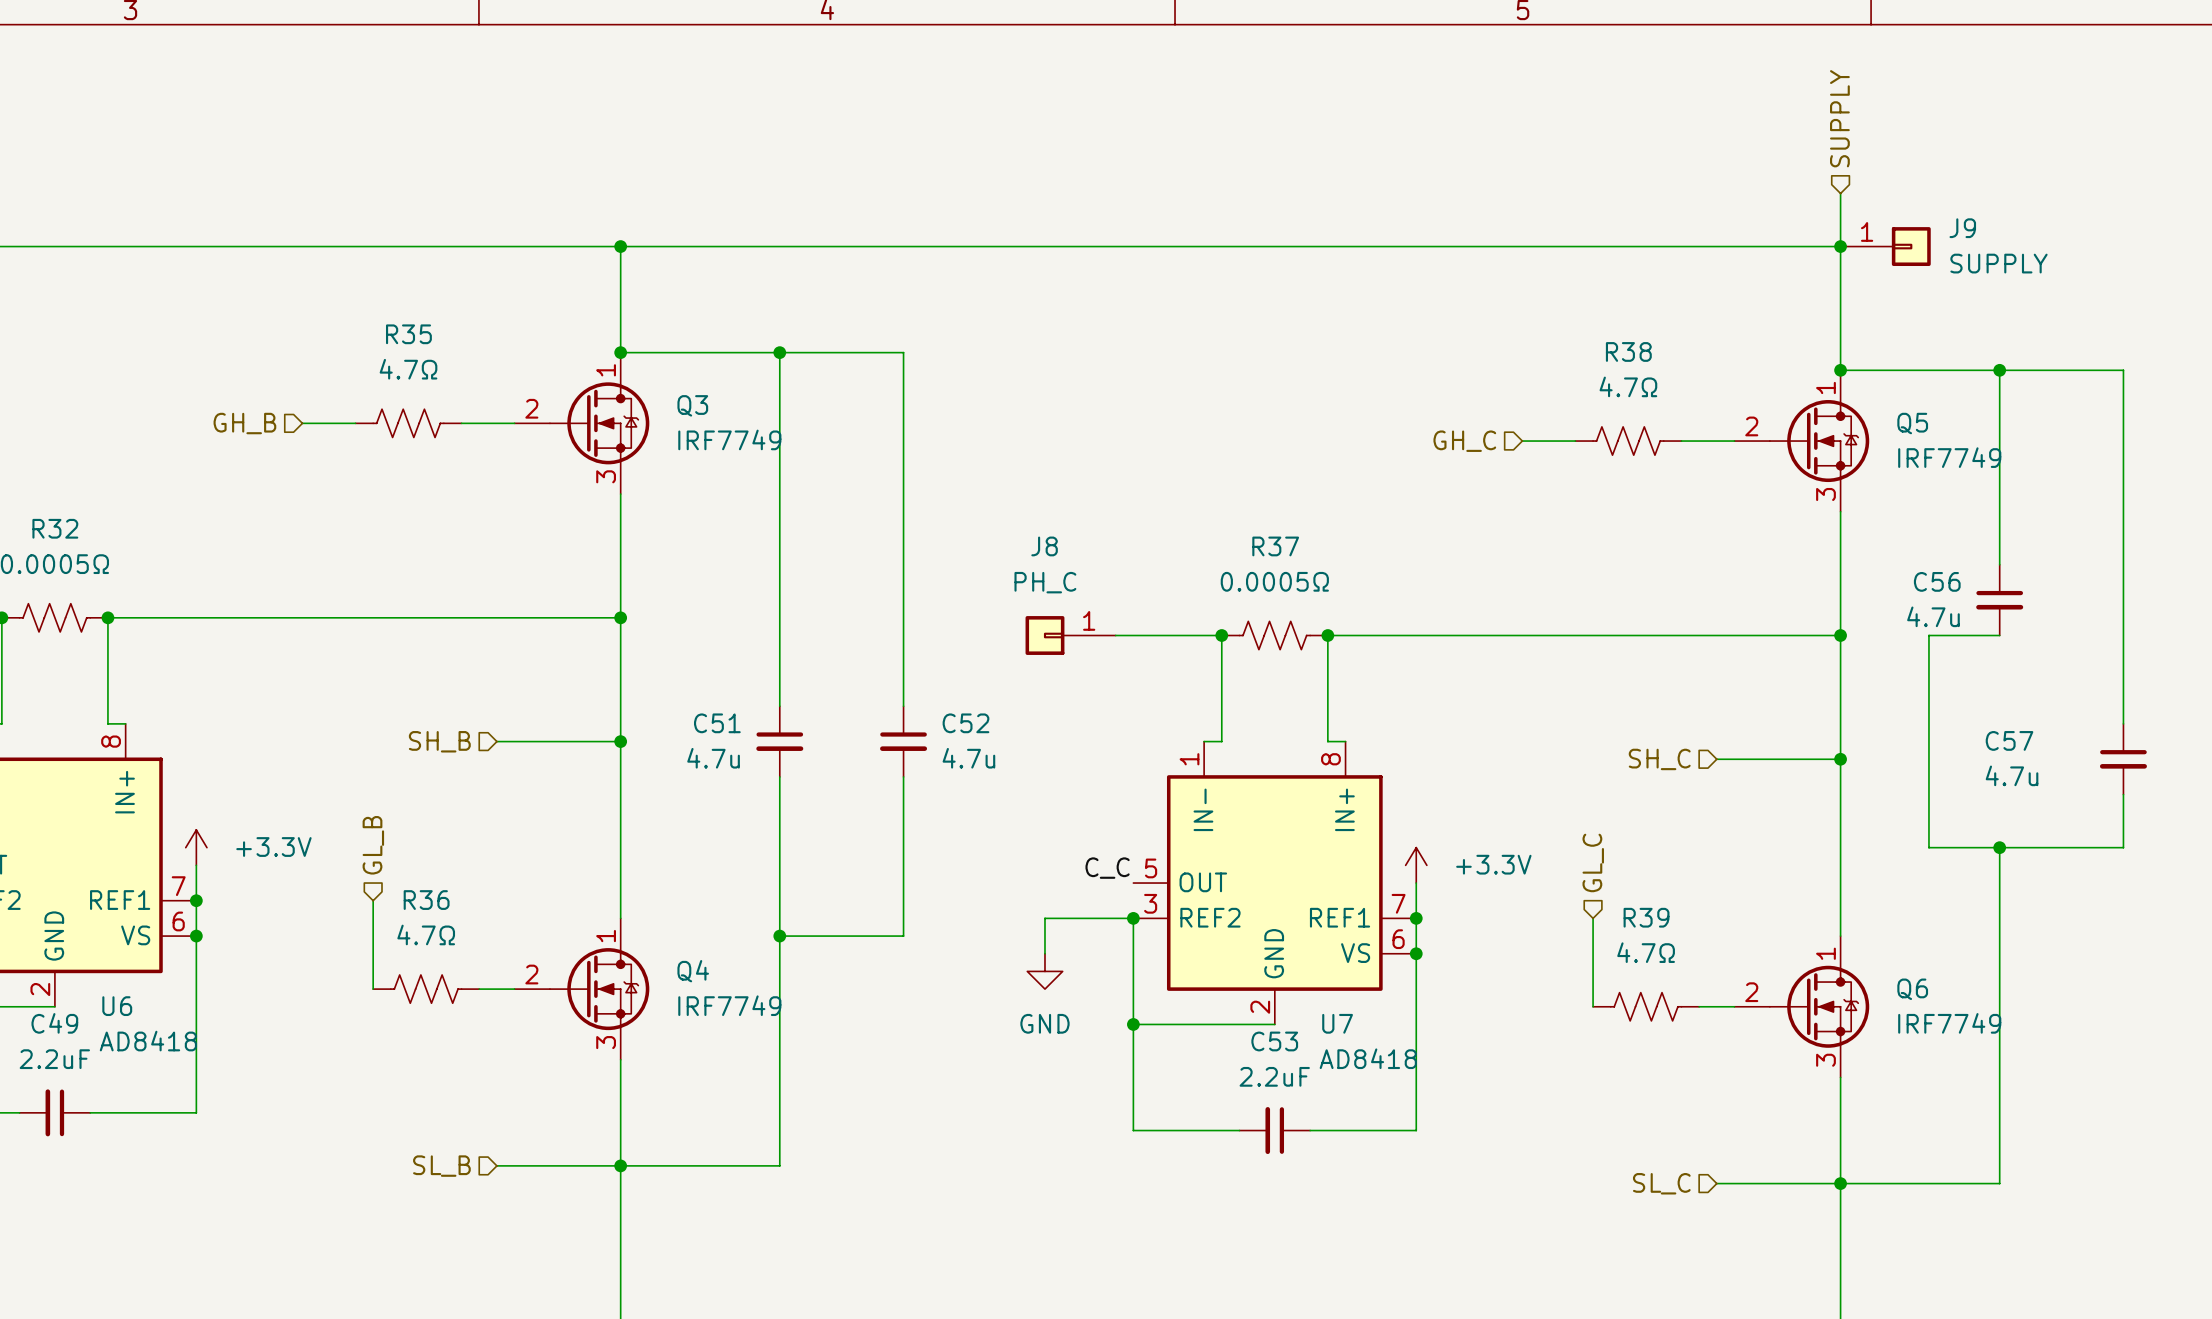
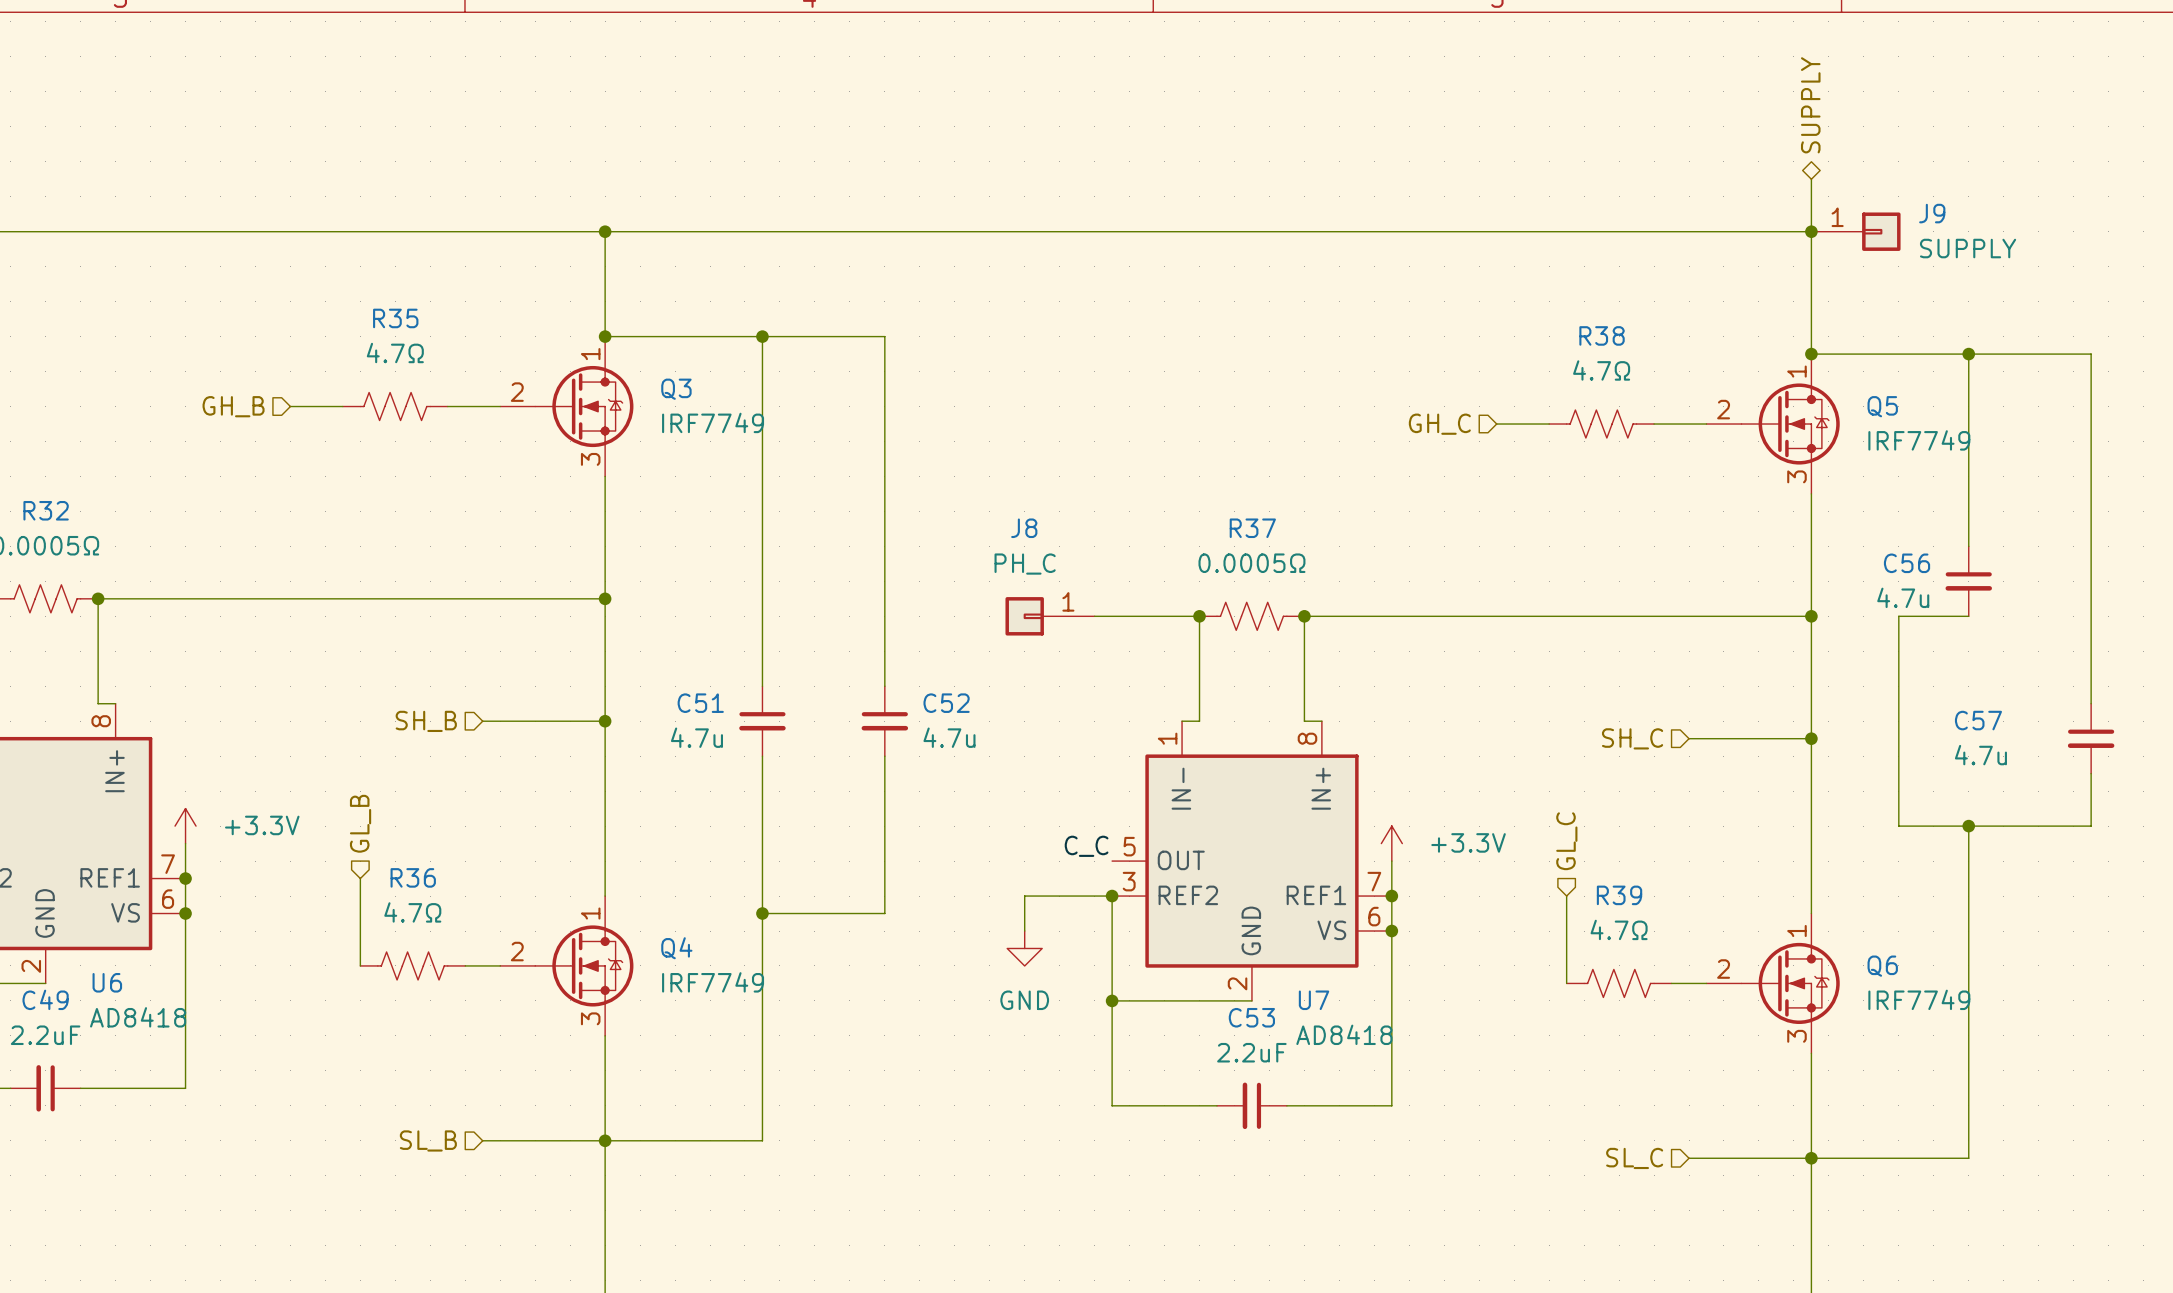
hierarchical label shape: input (1839, 118) -> bidirectional (1810, 105)

